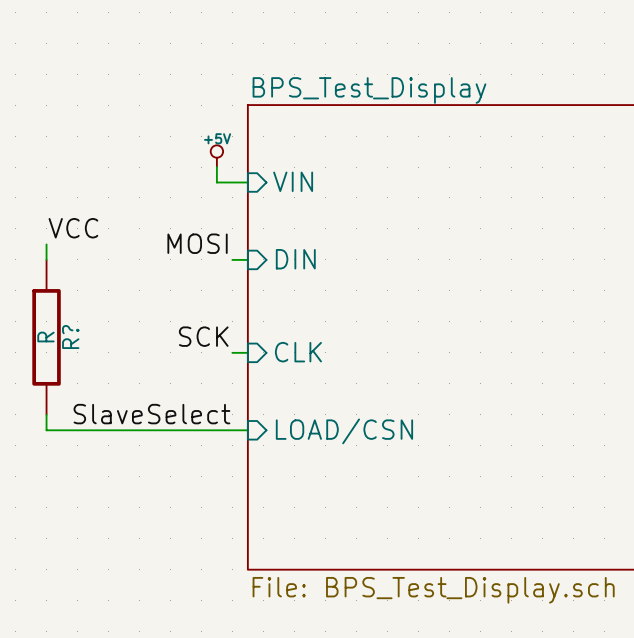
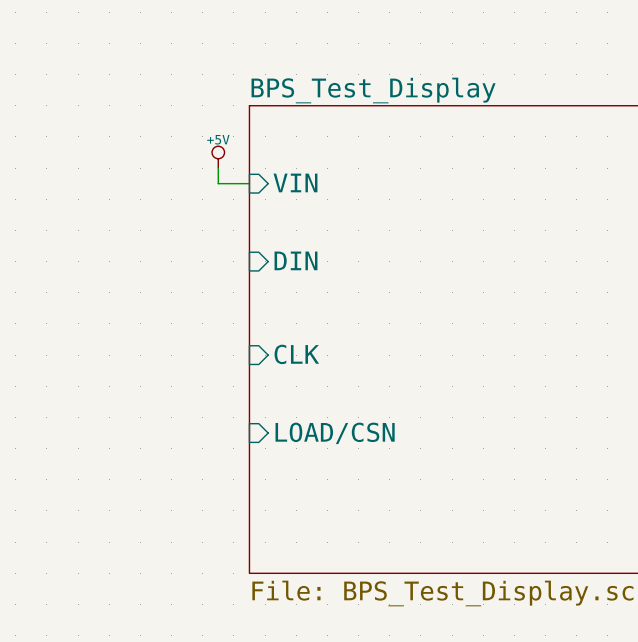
label: VCC (73, 228) -> none
label: MOSI (197, 243) -> none
wire: (46, 244) (46, 259) -> none
wire: (232, 259) (247, 259) -> none
label: SCK (203, 336) -> none
R?: R (46, 337) -> none
wire: (232, 352) (247, 352) -> none
wire: (46, 414) (46, 430) (247, 430) -> none
label: SlaveSelect (151, 414) -> none

